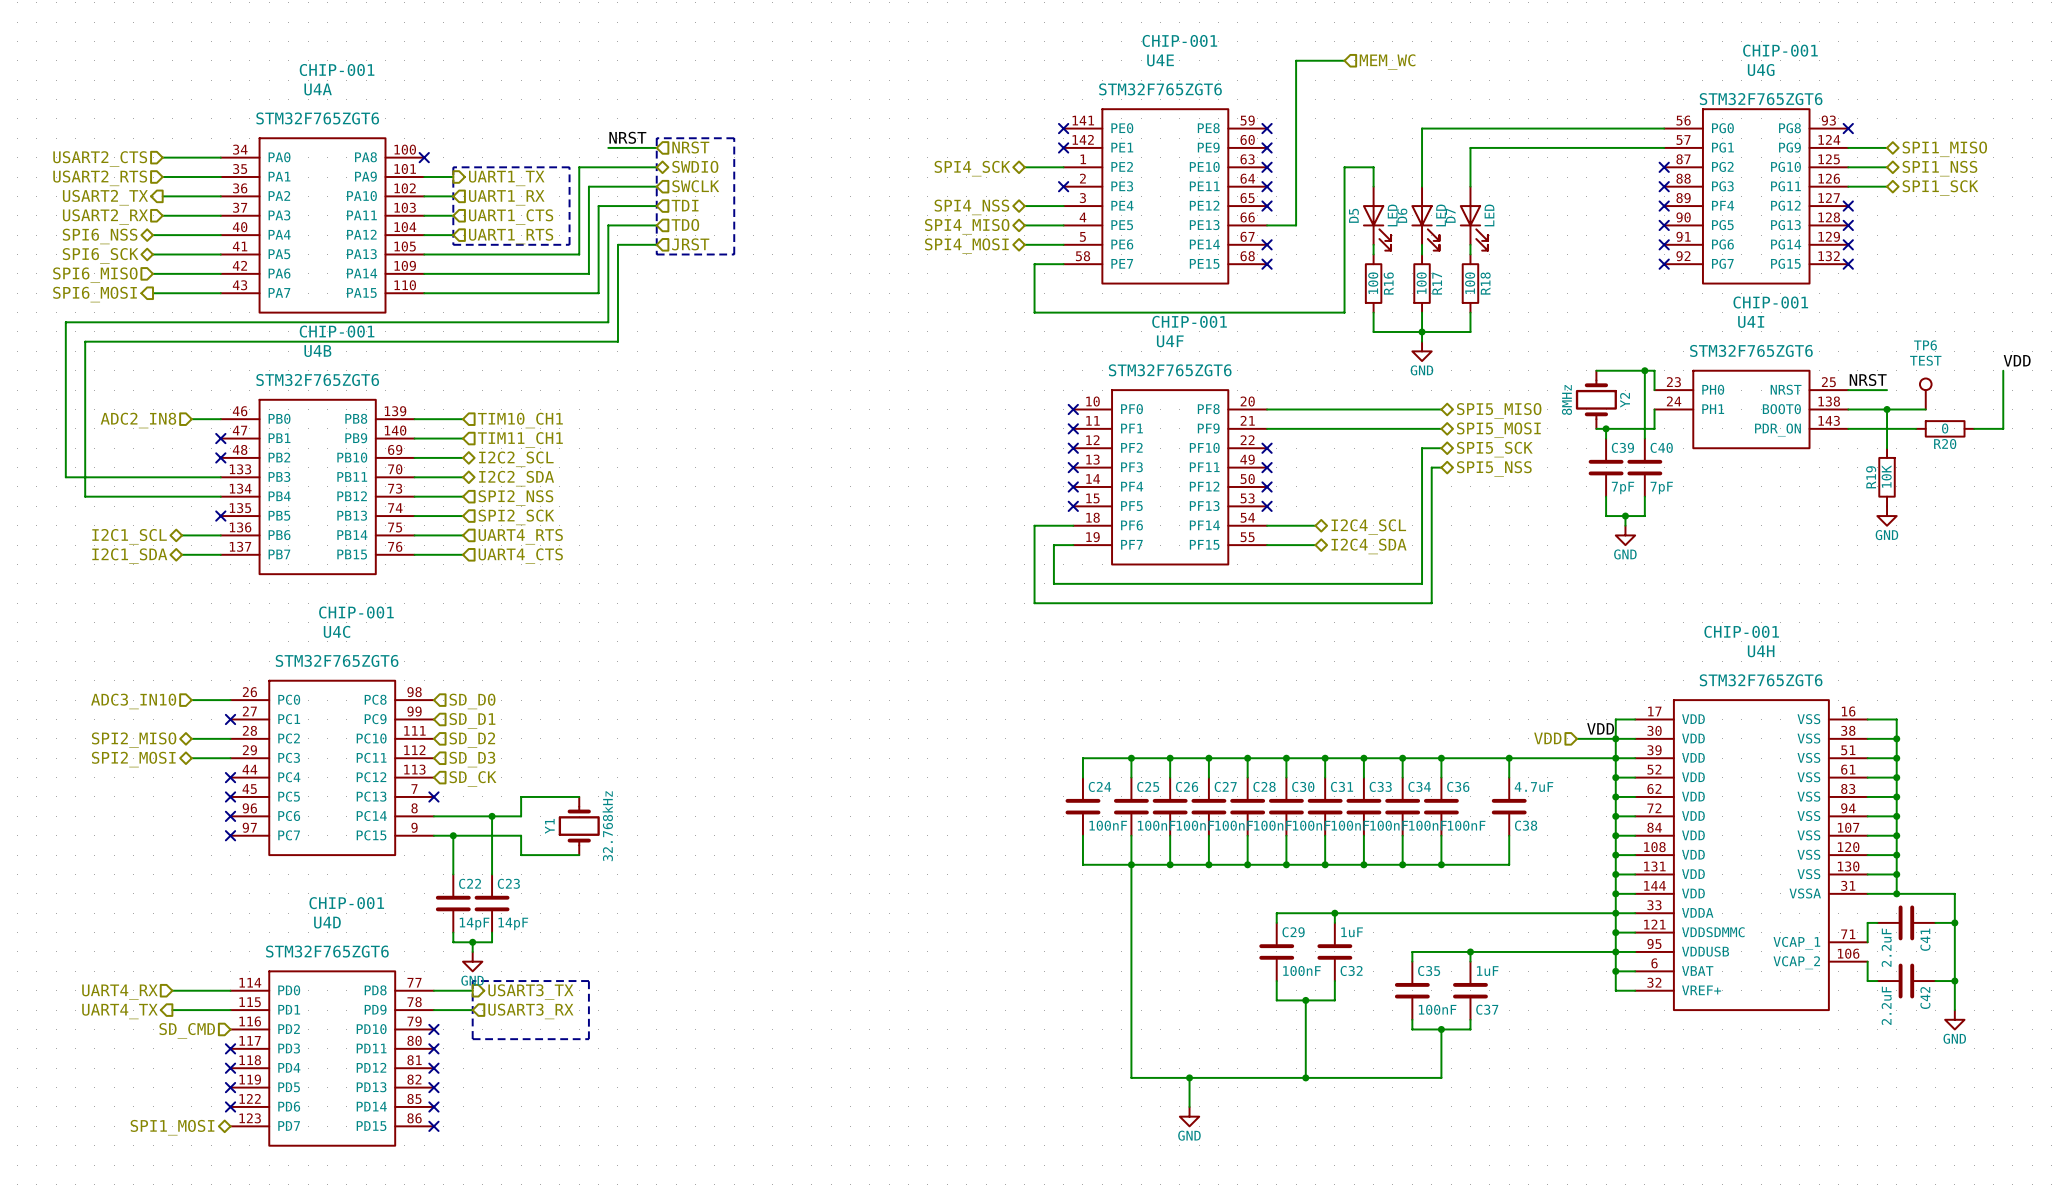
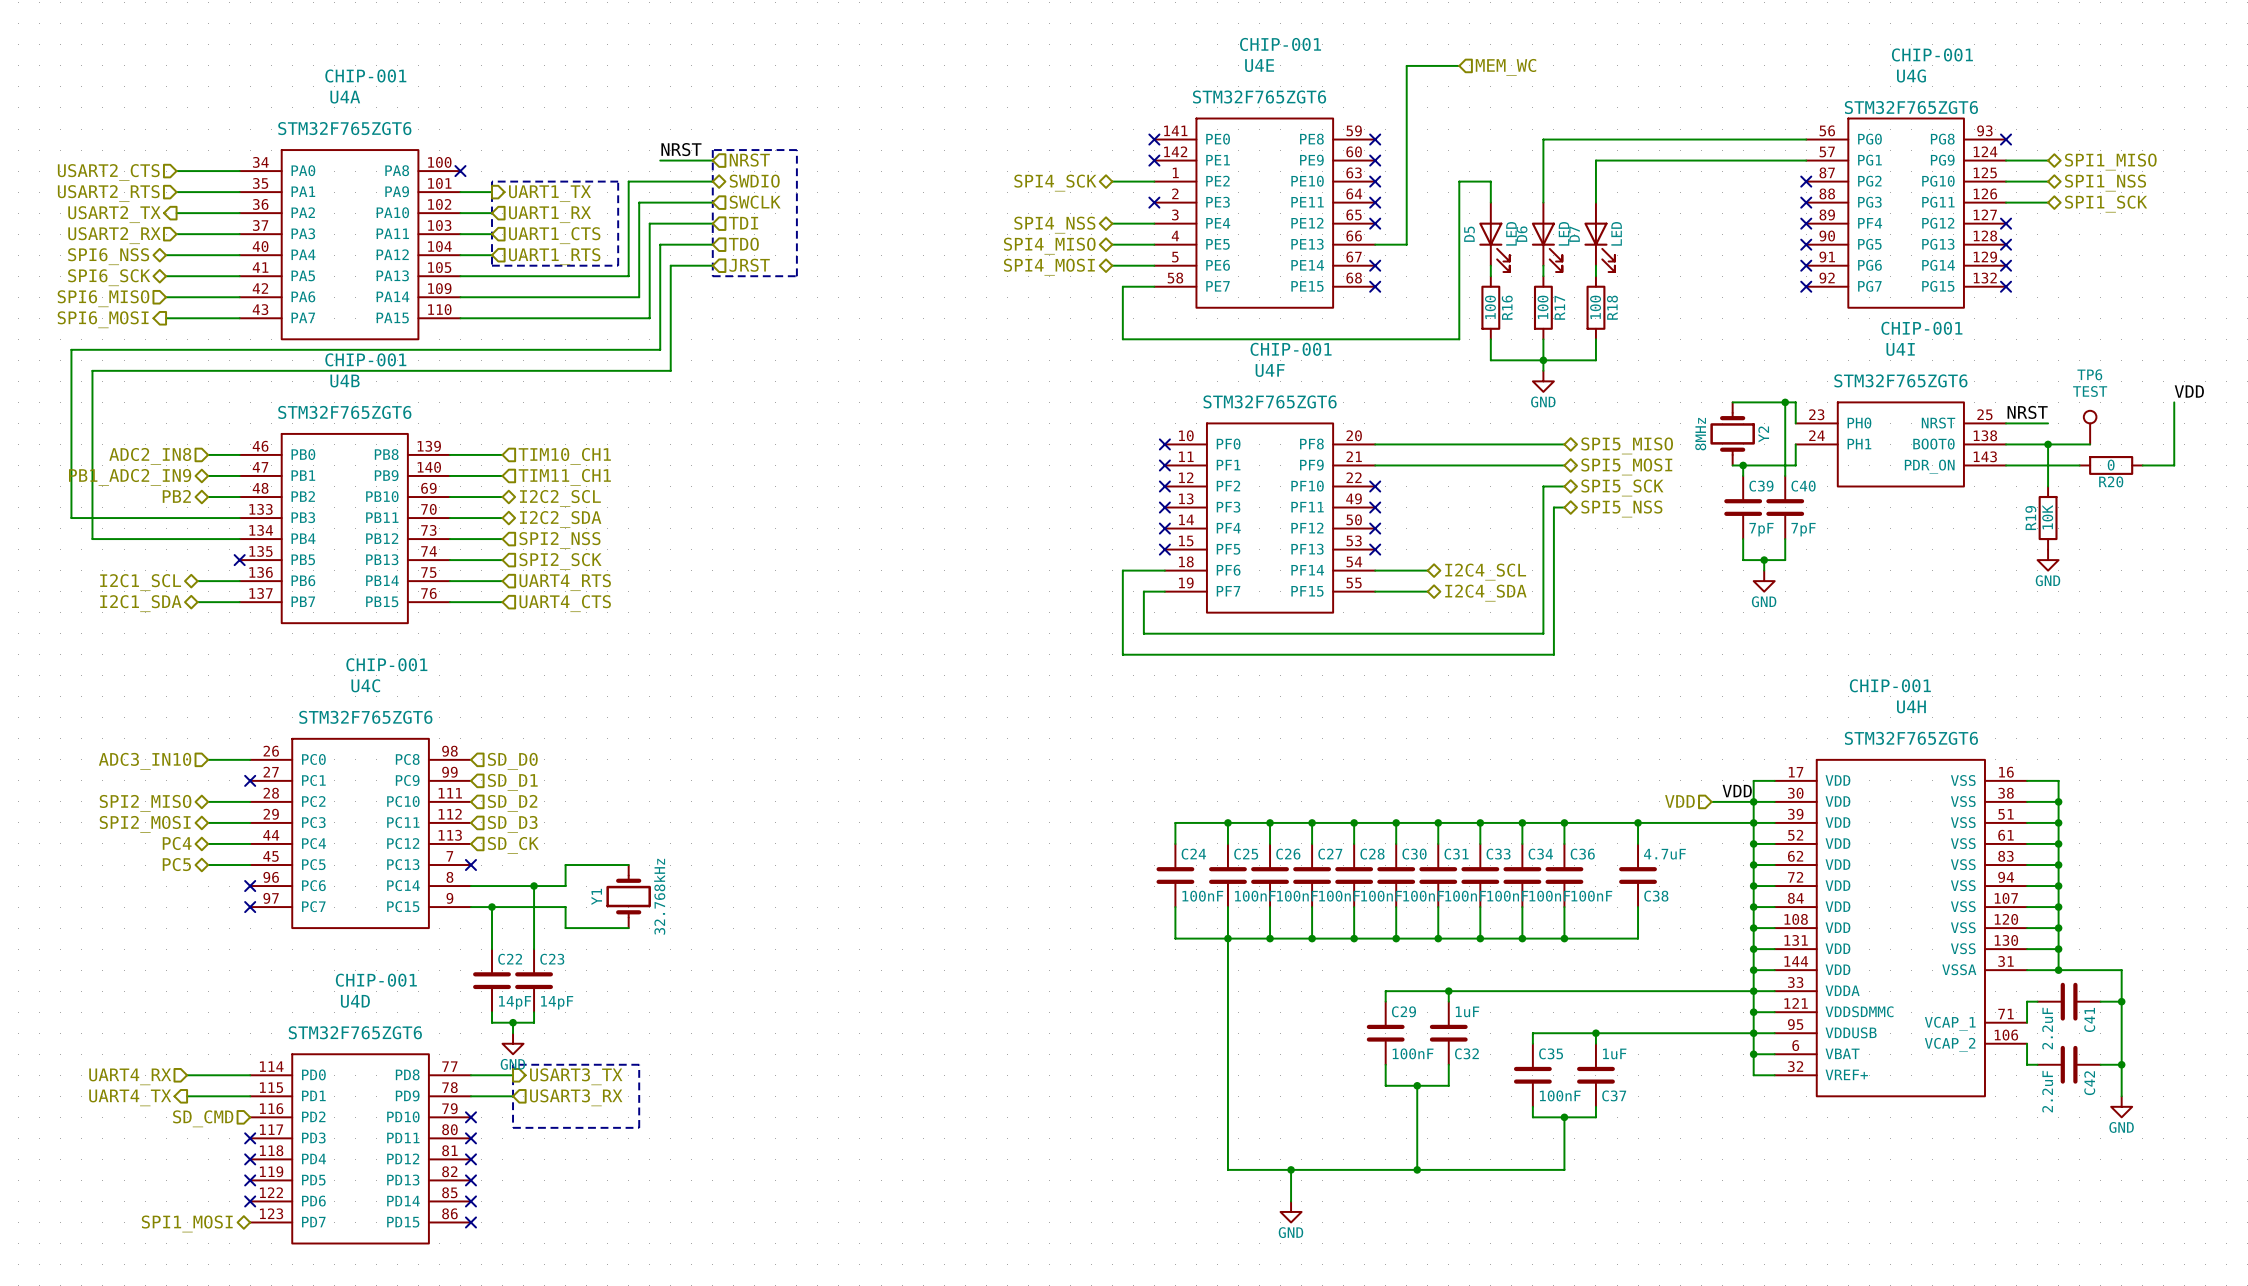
wire: none -> (208, 475) (239, 475)
no-connect mark: (220, 438) -> none
hierarchical label: none -> PB1_ADC2_IN9 (130, 477)
hierarchical label: none -> PB2 (176, 496)
wire: none -> (208, 497) (239, 497)
no-connect mark: (220, 457) -> none
hierarchical label: none -> PC4 (177, 843)
wire: none -> (208, 843) (250, 843)
no-connect mark: (230, 777) -> none
hierarchical label: none -> PC5 (176, 864)
wire: none -> (208, 865) (250, 865)
no-connect mark: (230, 796) -> none

